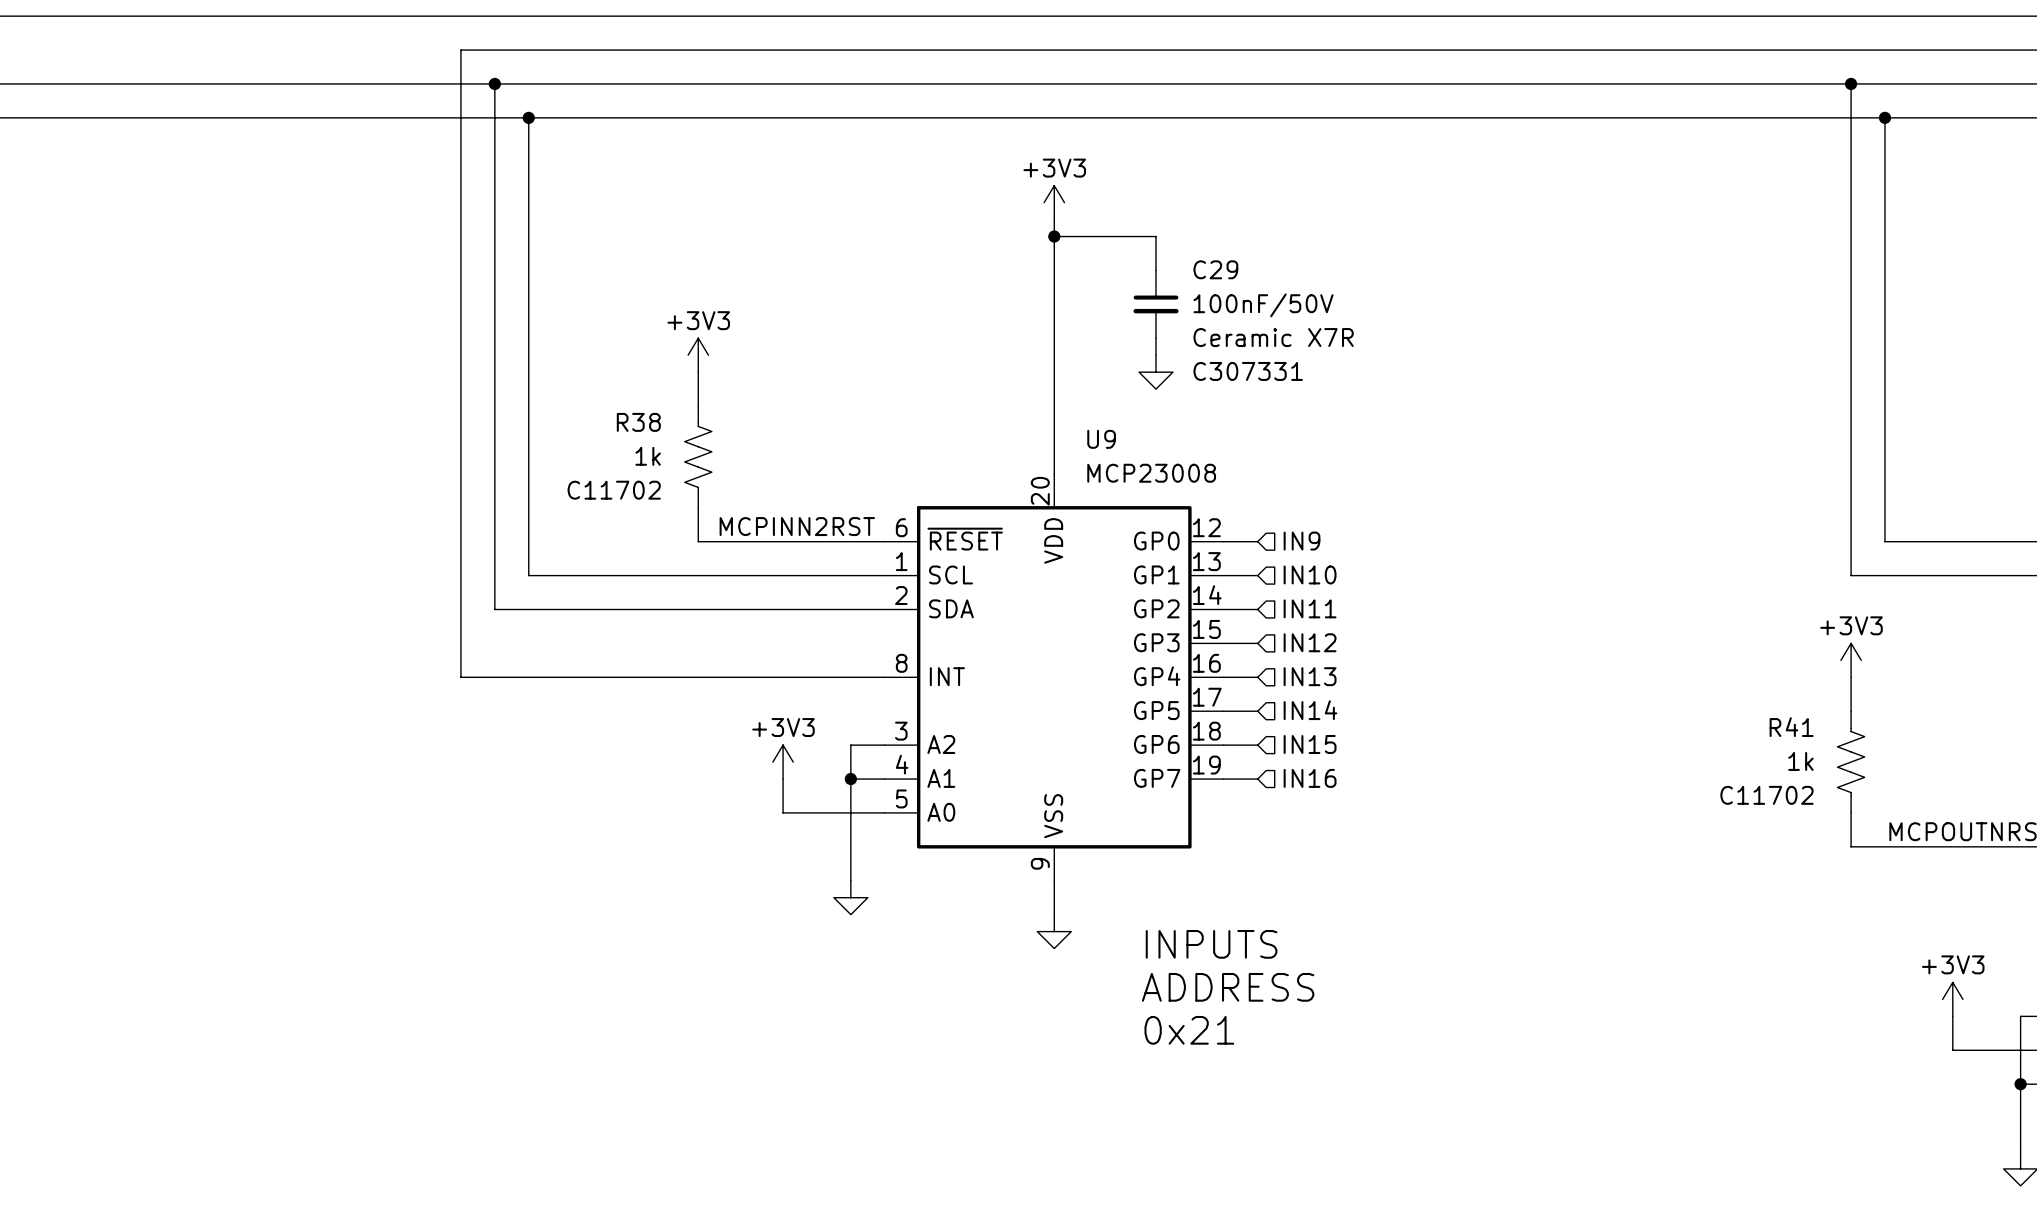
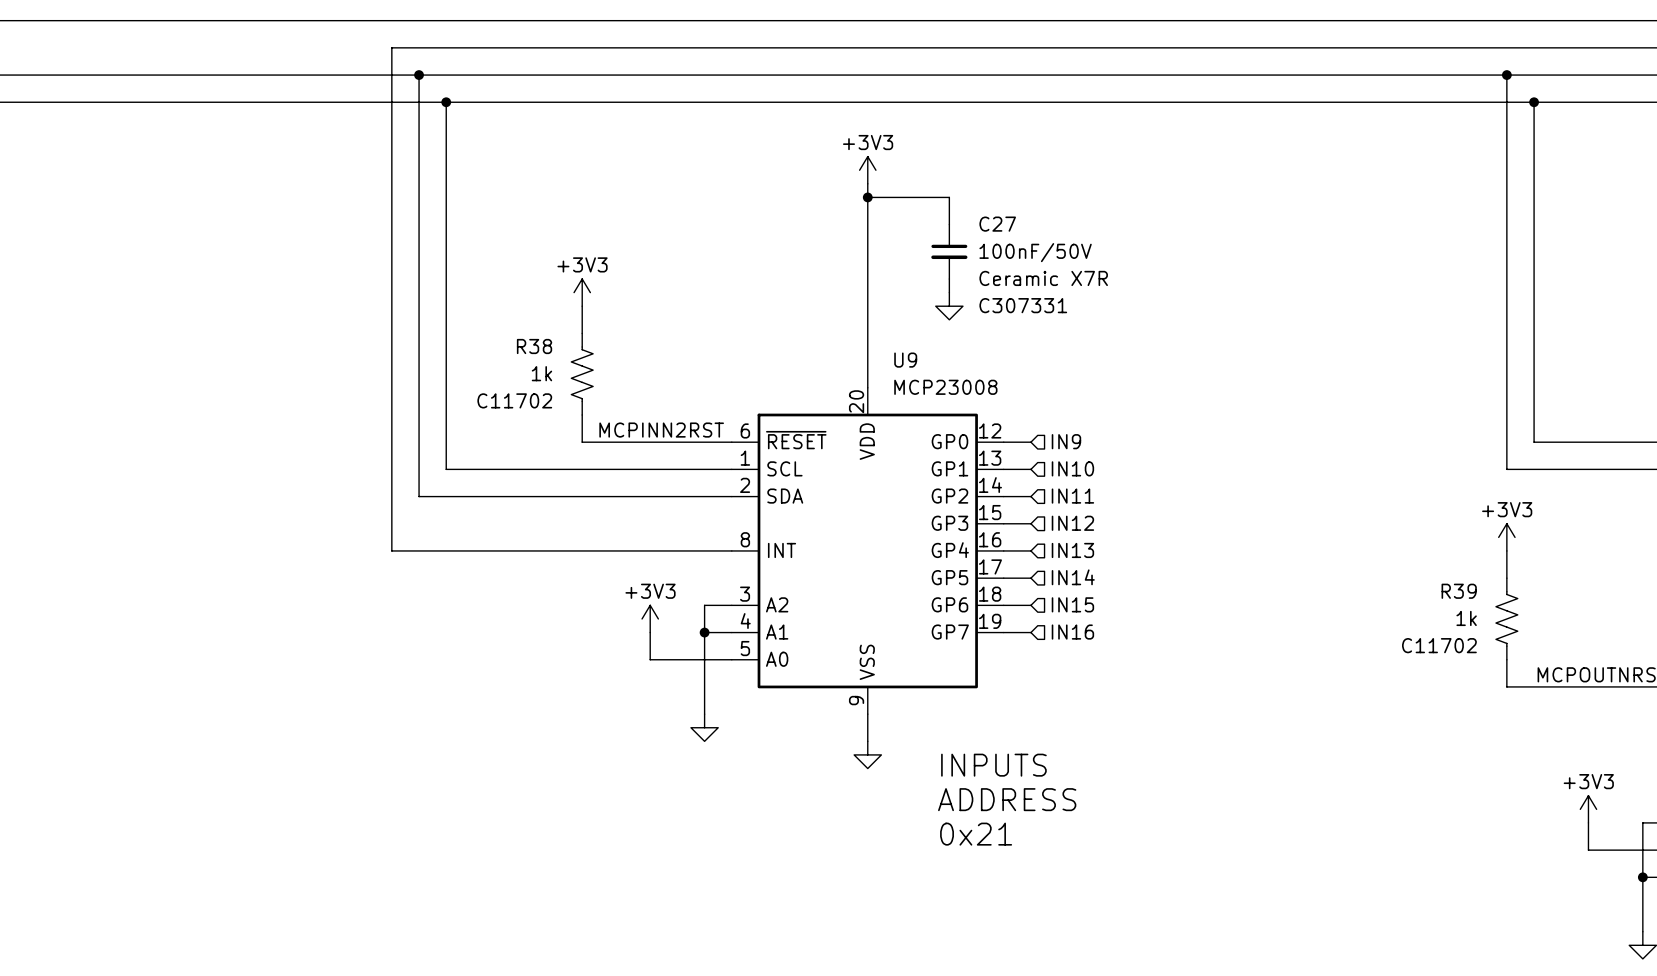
C29 name: C29 (1215, 269) -> C27 (997, 224)
R41 name: R41 (1791, 727) -> R39 (1459, 591)

